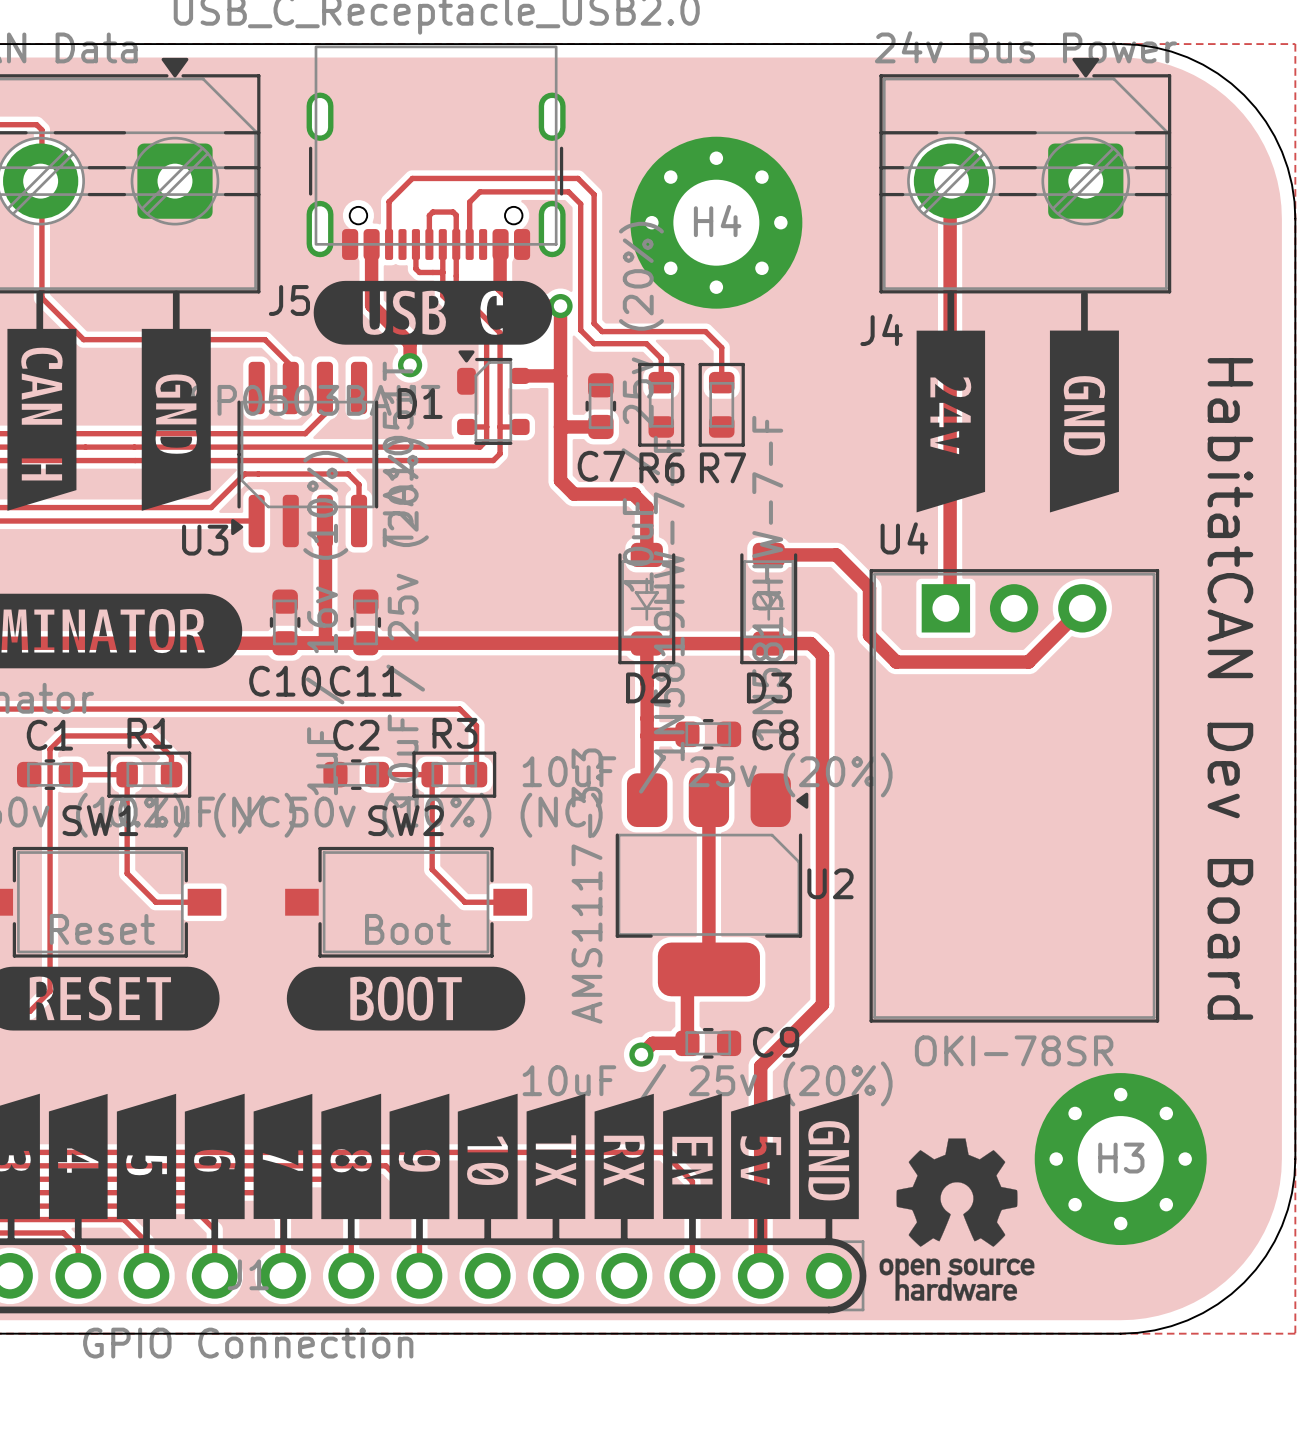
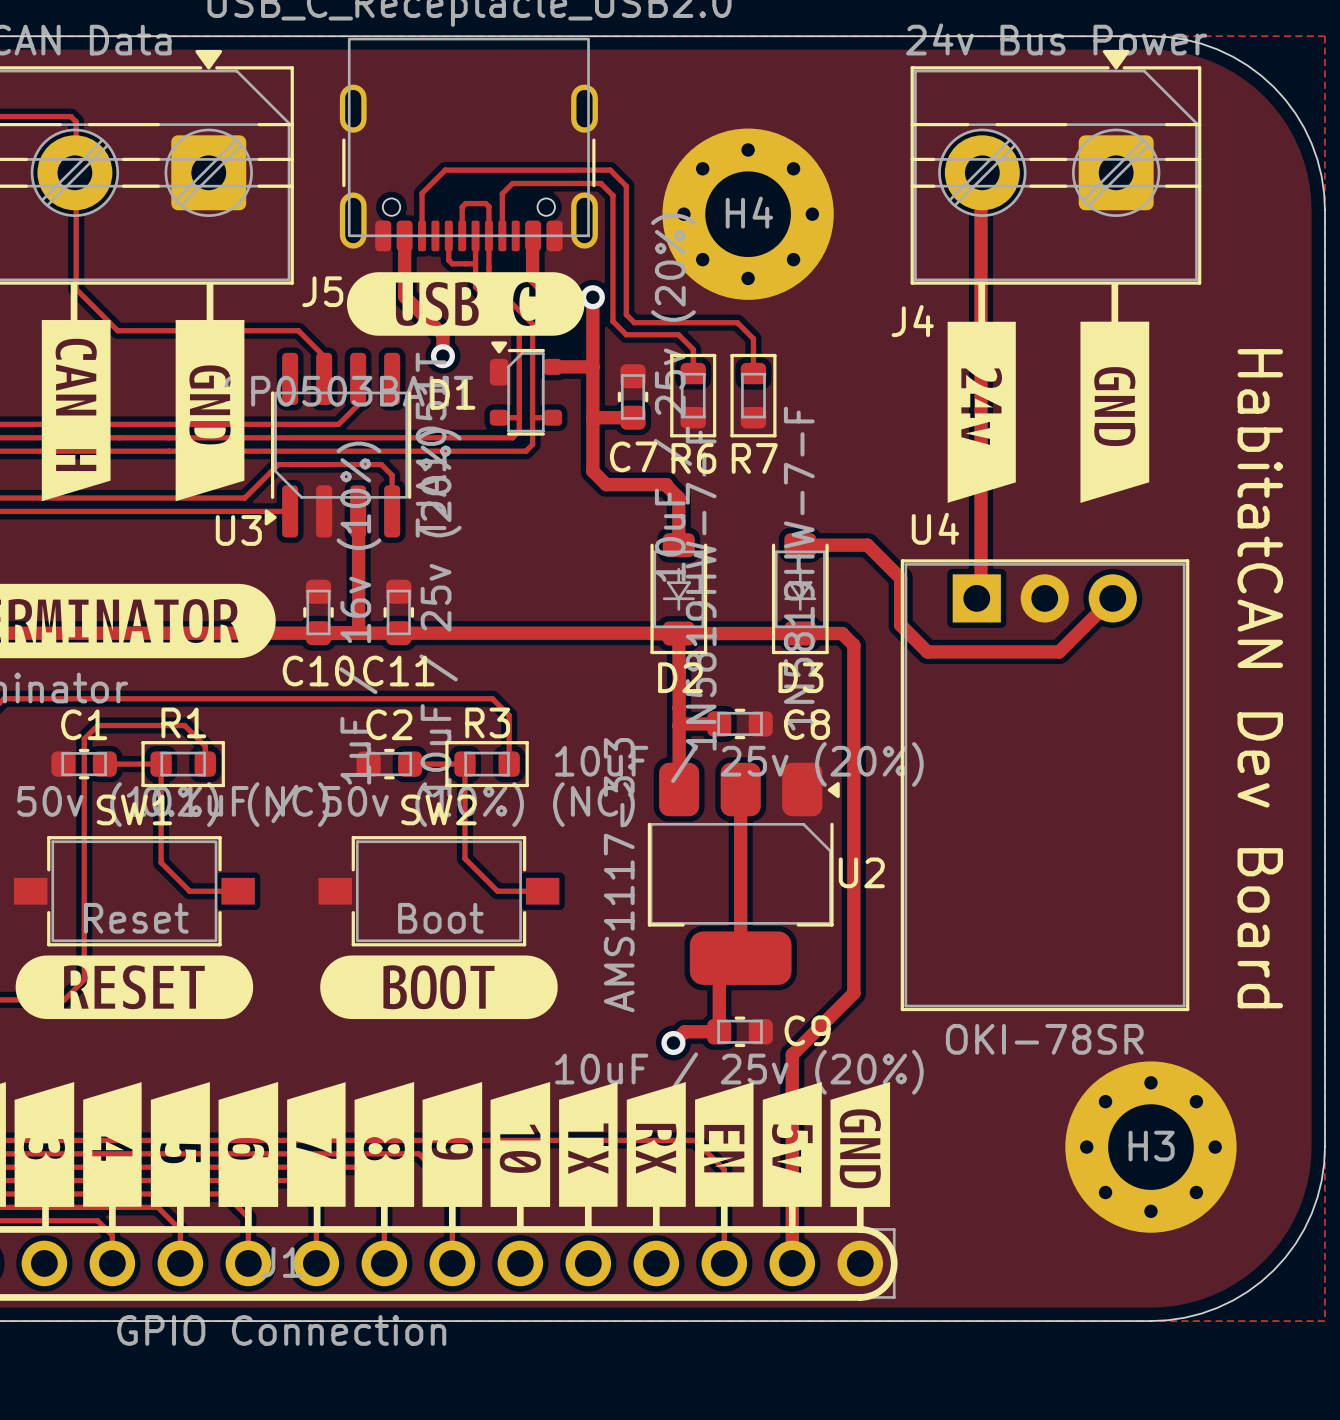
drawing: [879, 1138, 1035, 1301] -> none

